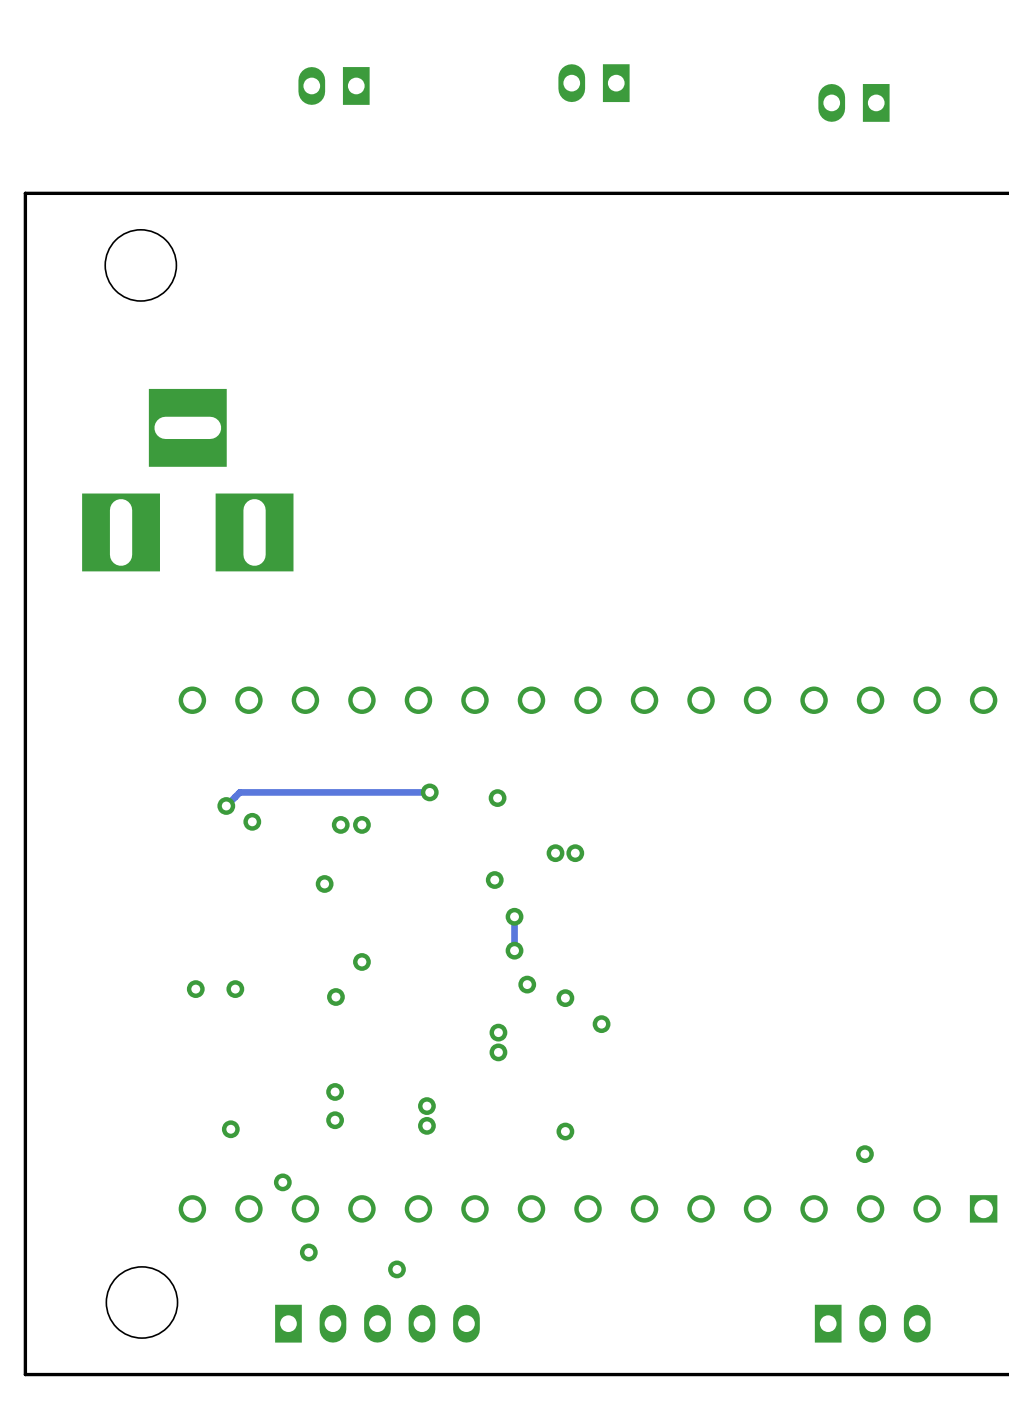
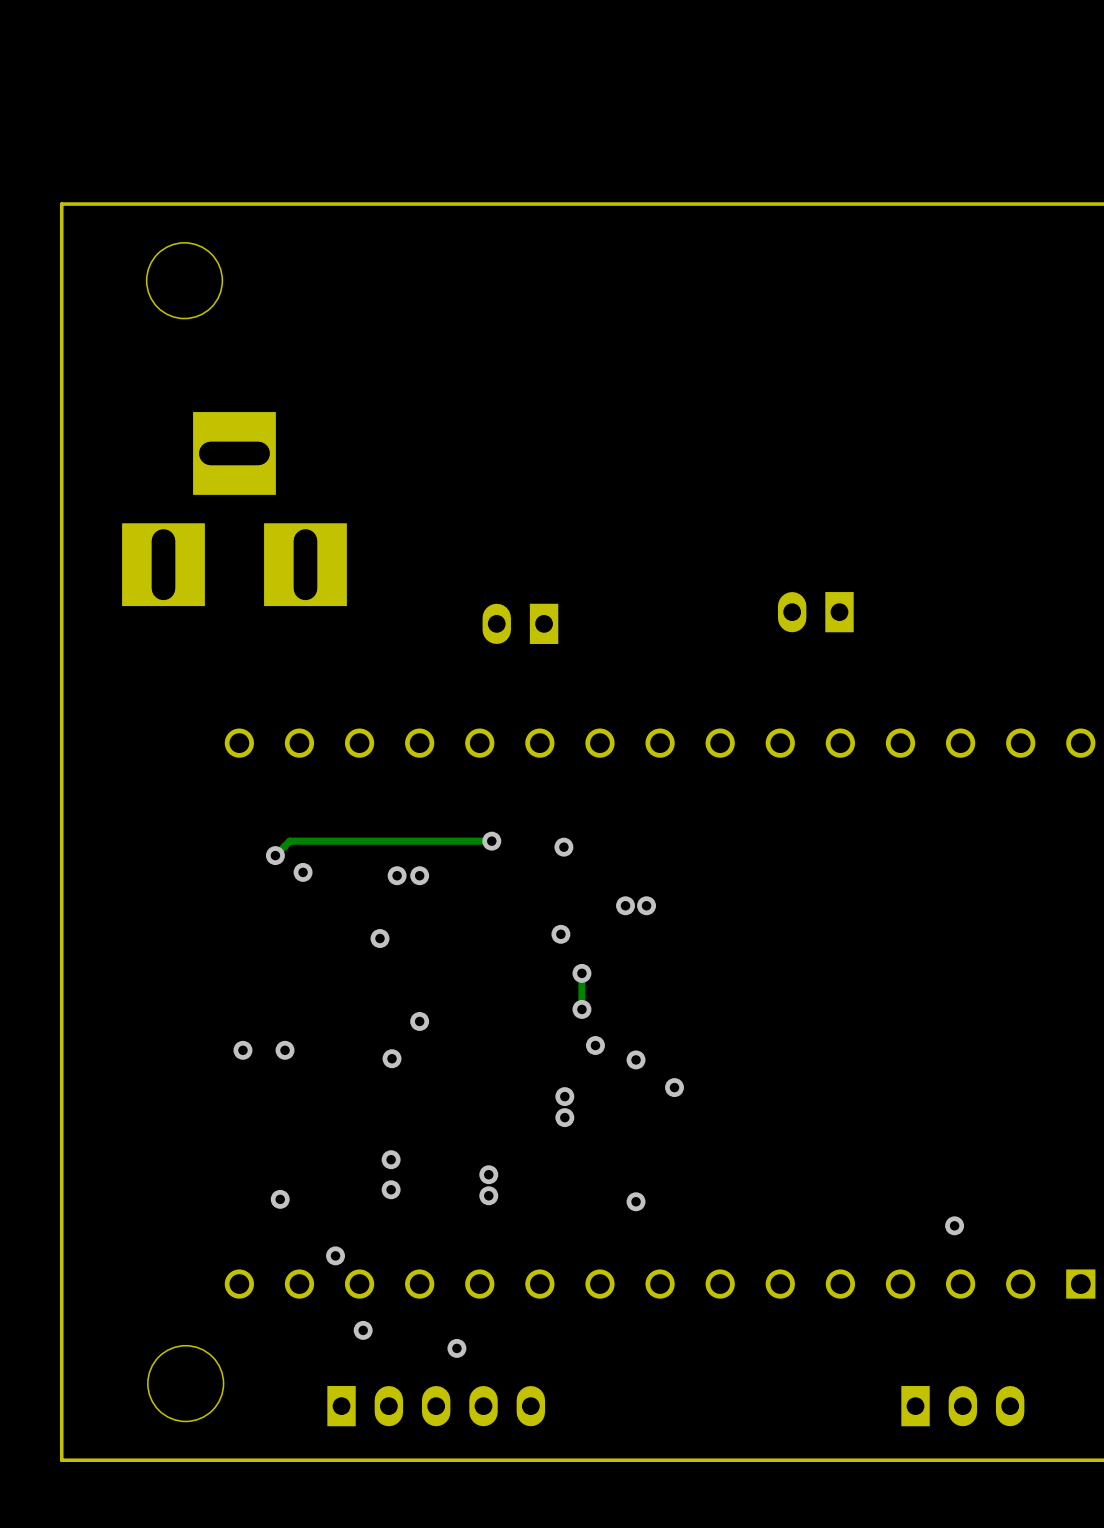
part: (594, 83) -> none
part: (334, 85) -> none
part: (853, 102) -> none
part: none -> (815, 612)
part: none -> (520, 623)

